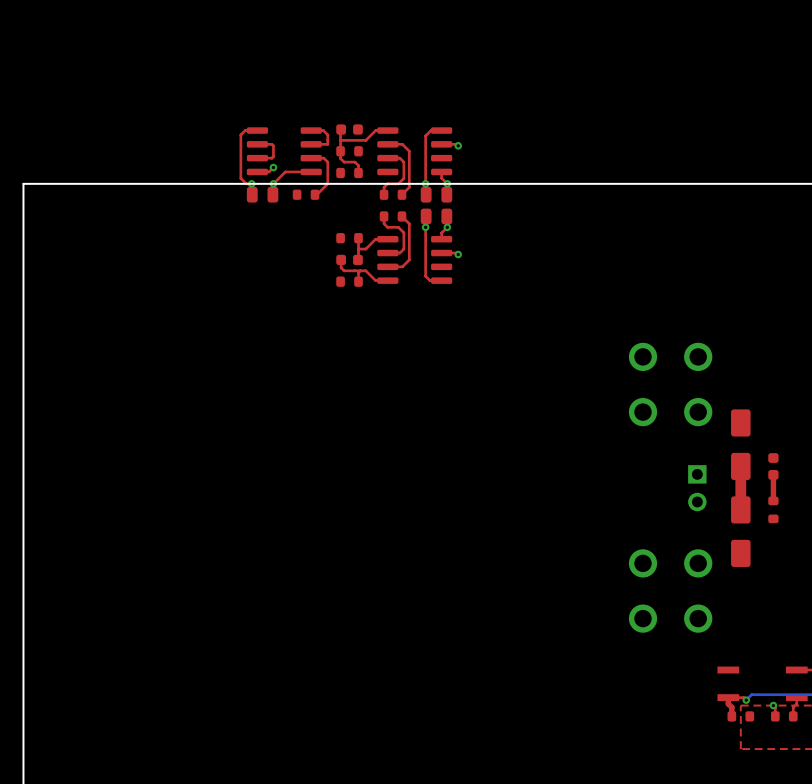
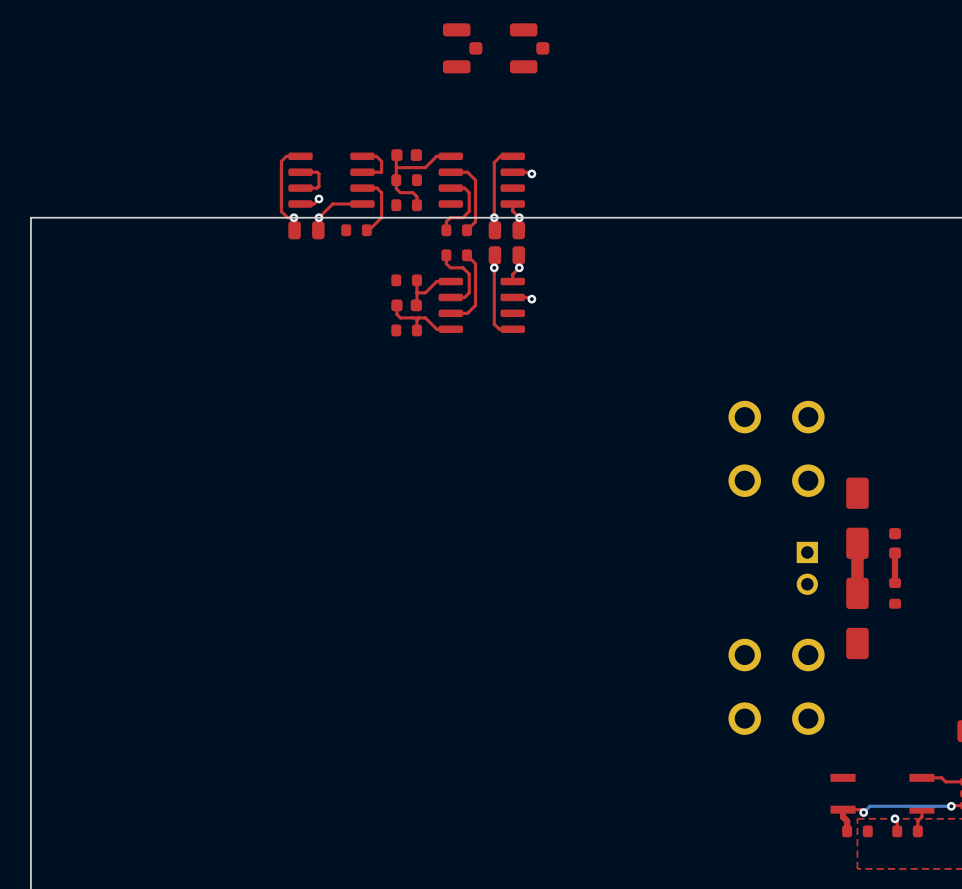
part: none -> (462, 48)
part: none -> (529, 48)

